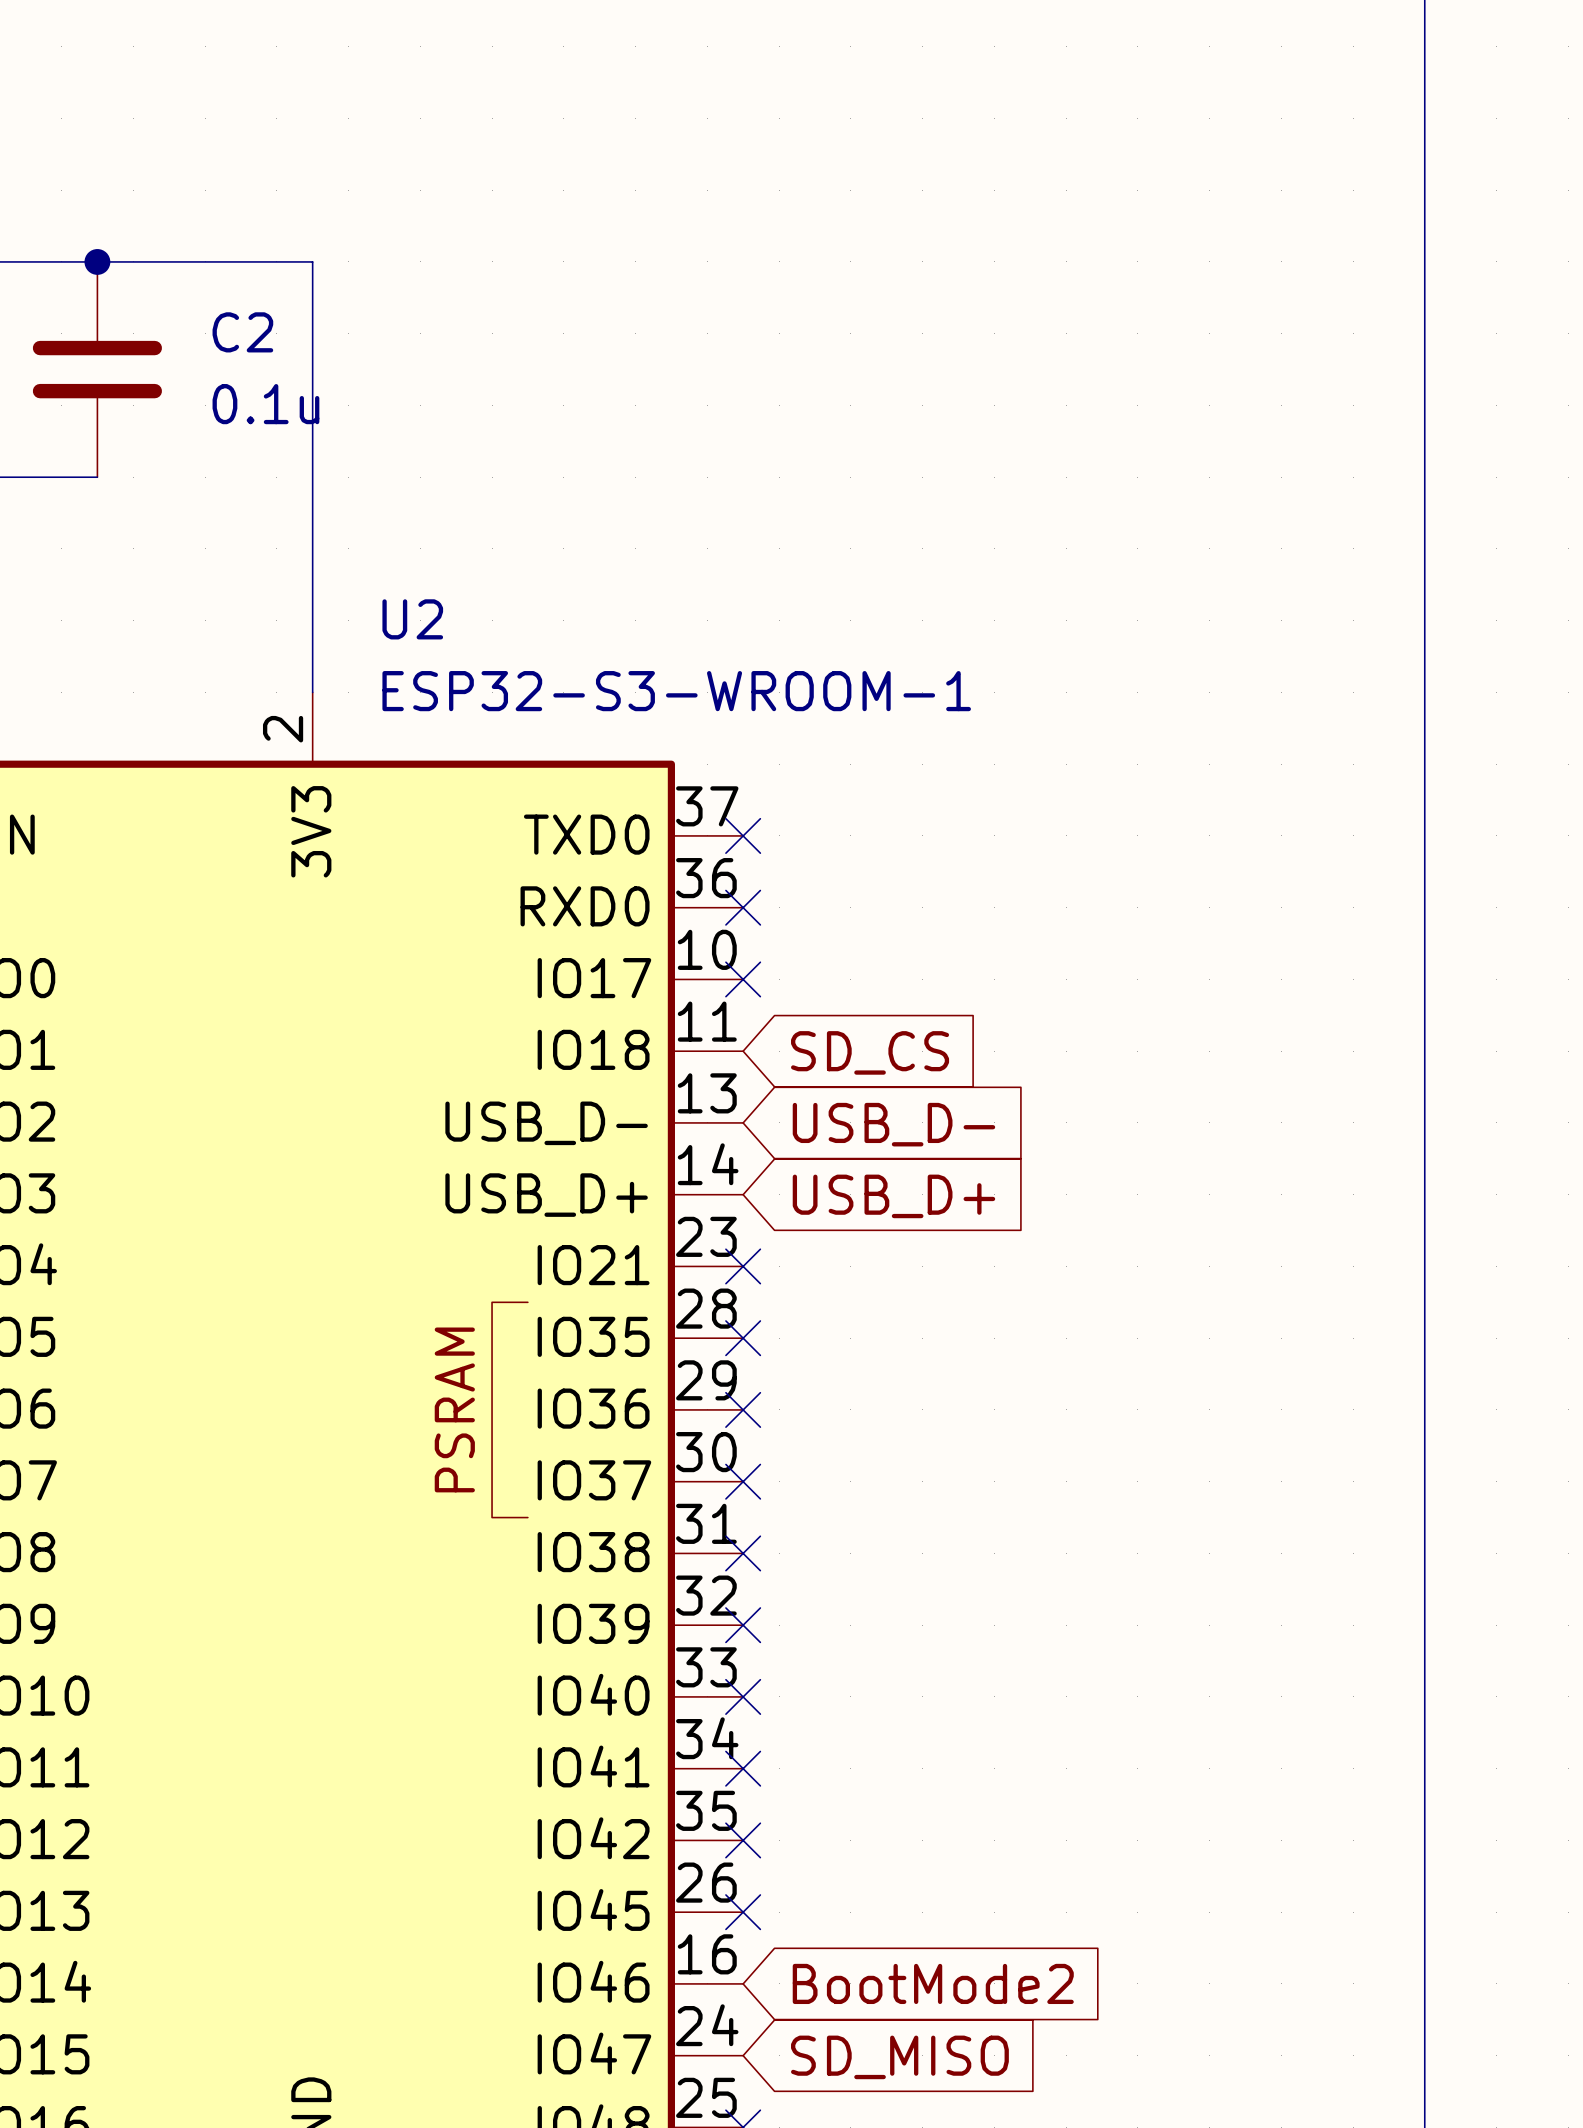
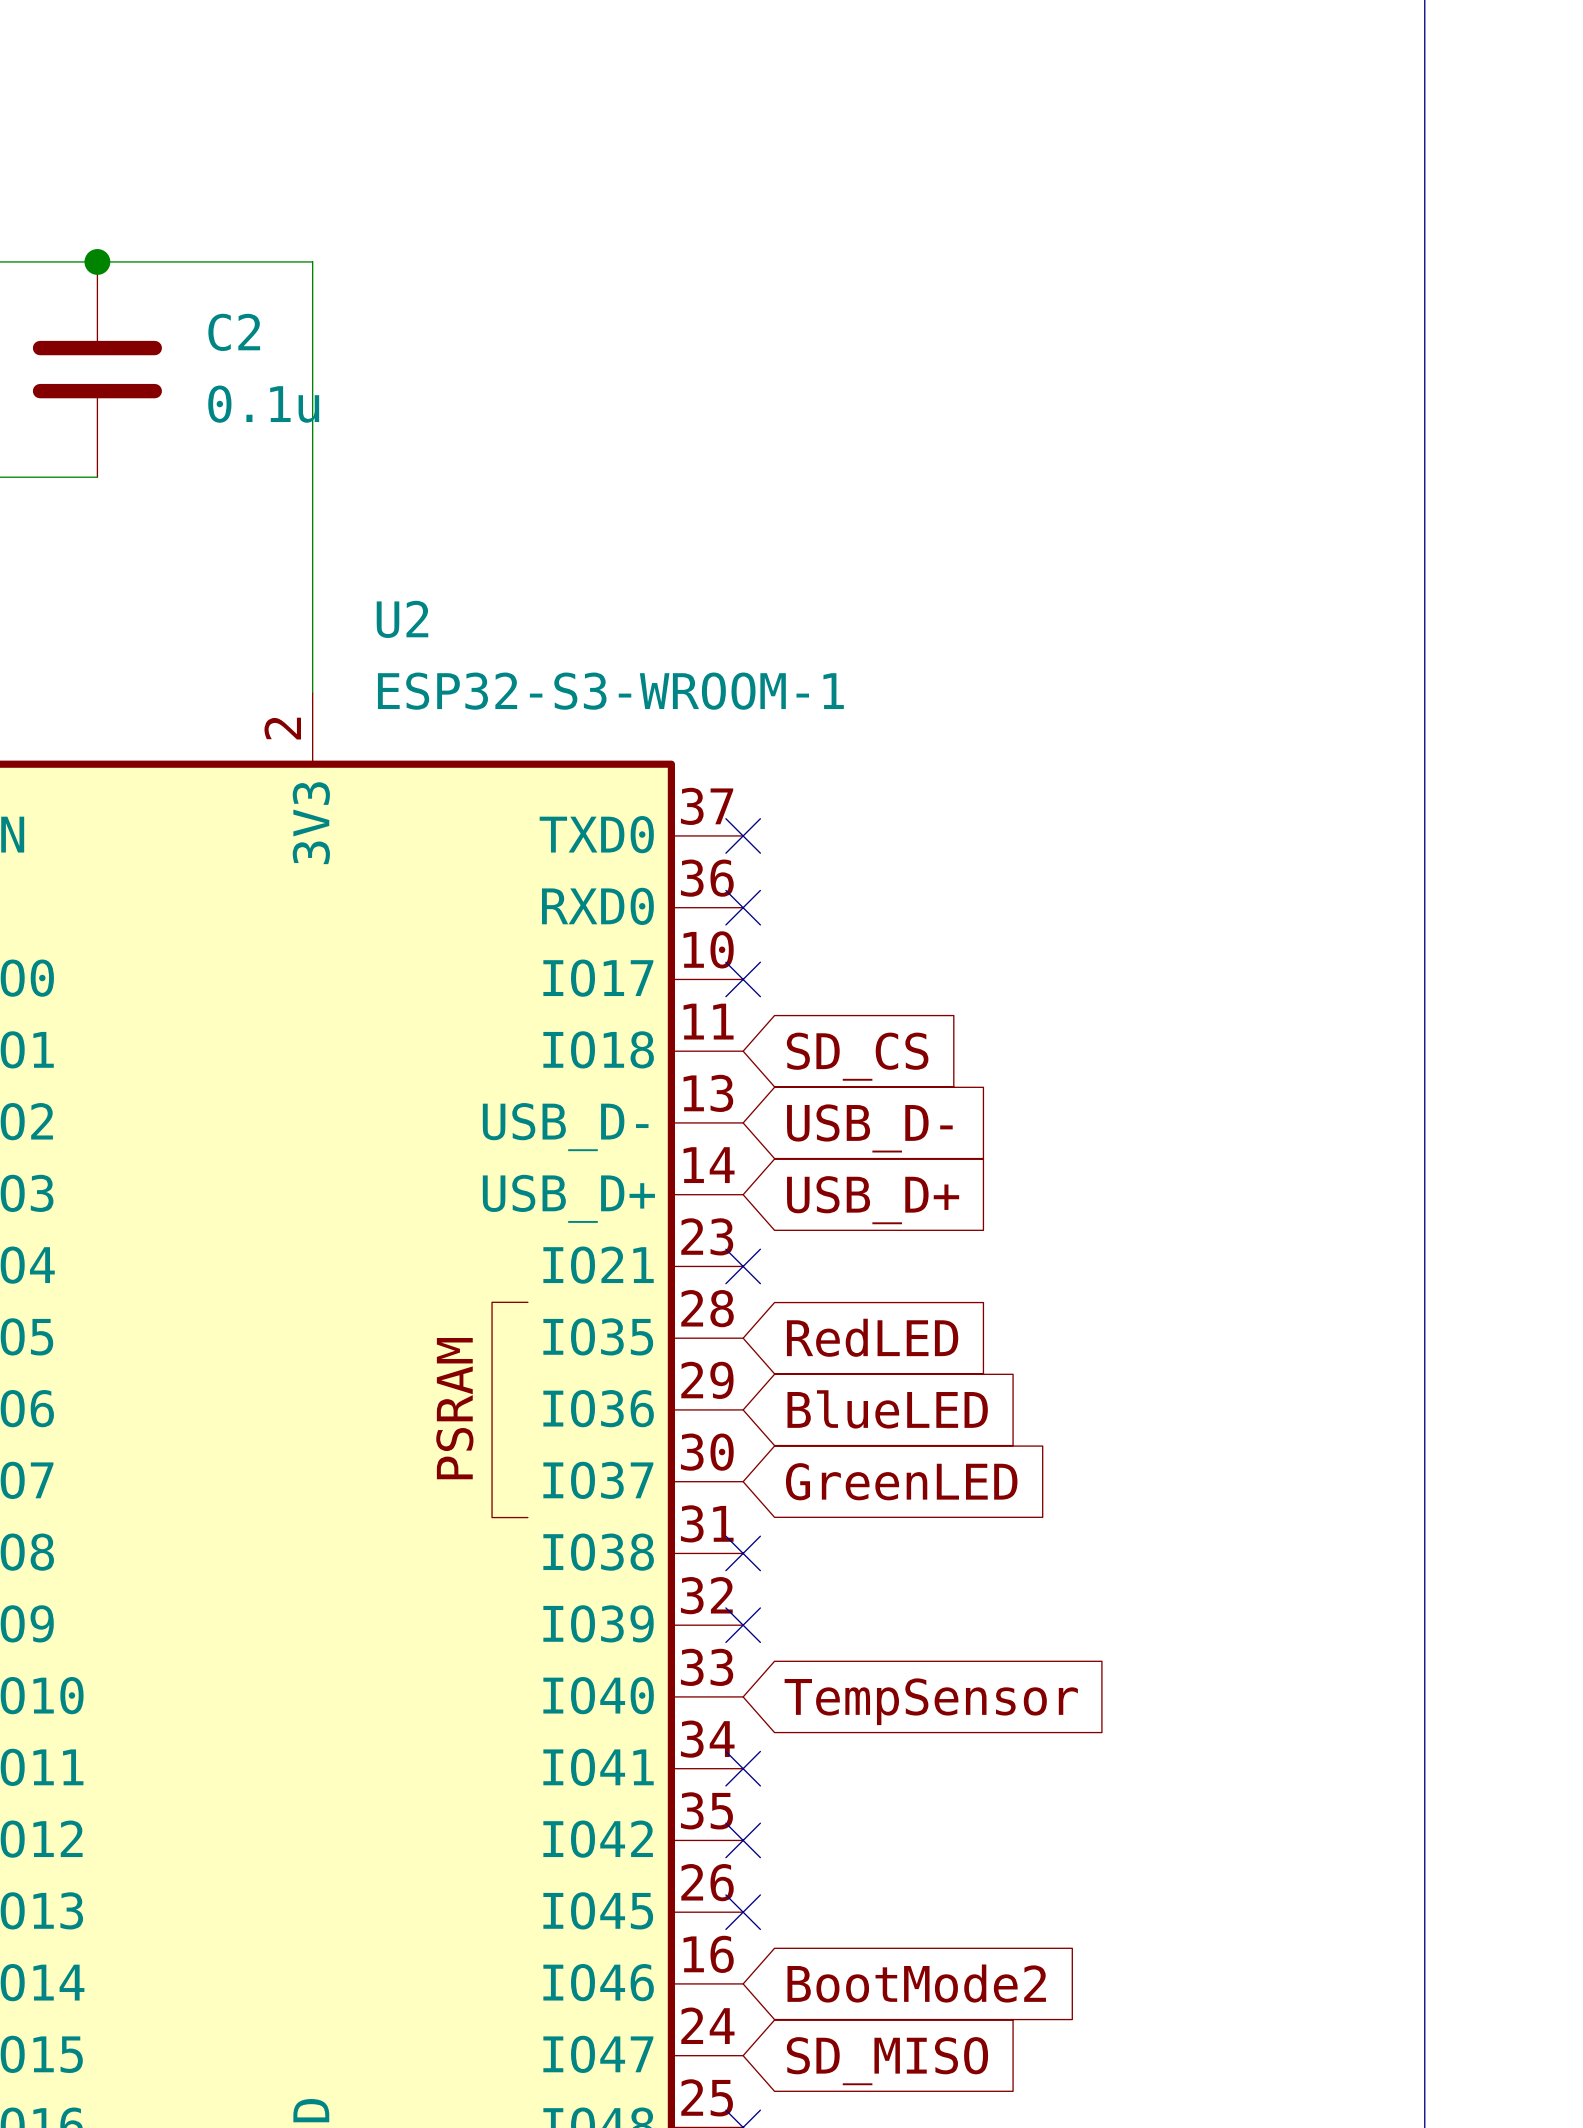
no-connect mark: (743, 1338) -> none
global label: none -> RedLED (872, 1337)
no-connect mark: (743, 1409) -> none
global label: none -> BlueLED (887, 1409)
no-connect mark: (743, 1481) -> none
global label: none -> GreenLED (901, 1481)
no-connect mark: (743, 1696) -> none
global label: none -> TempSensor (931, 1701)

